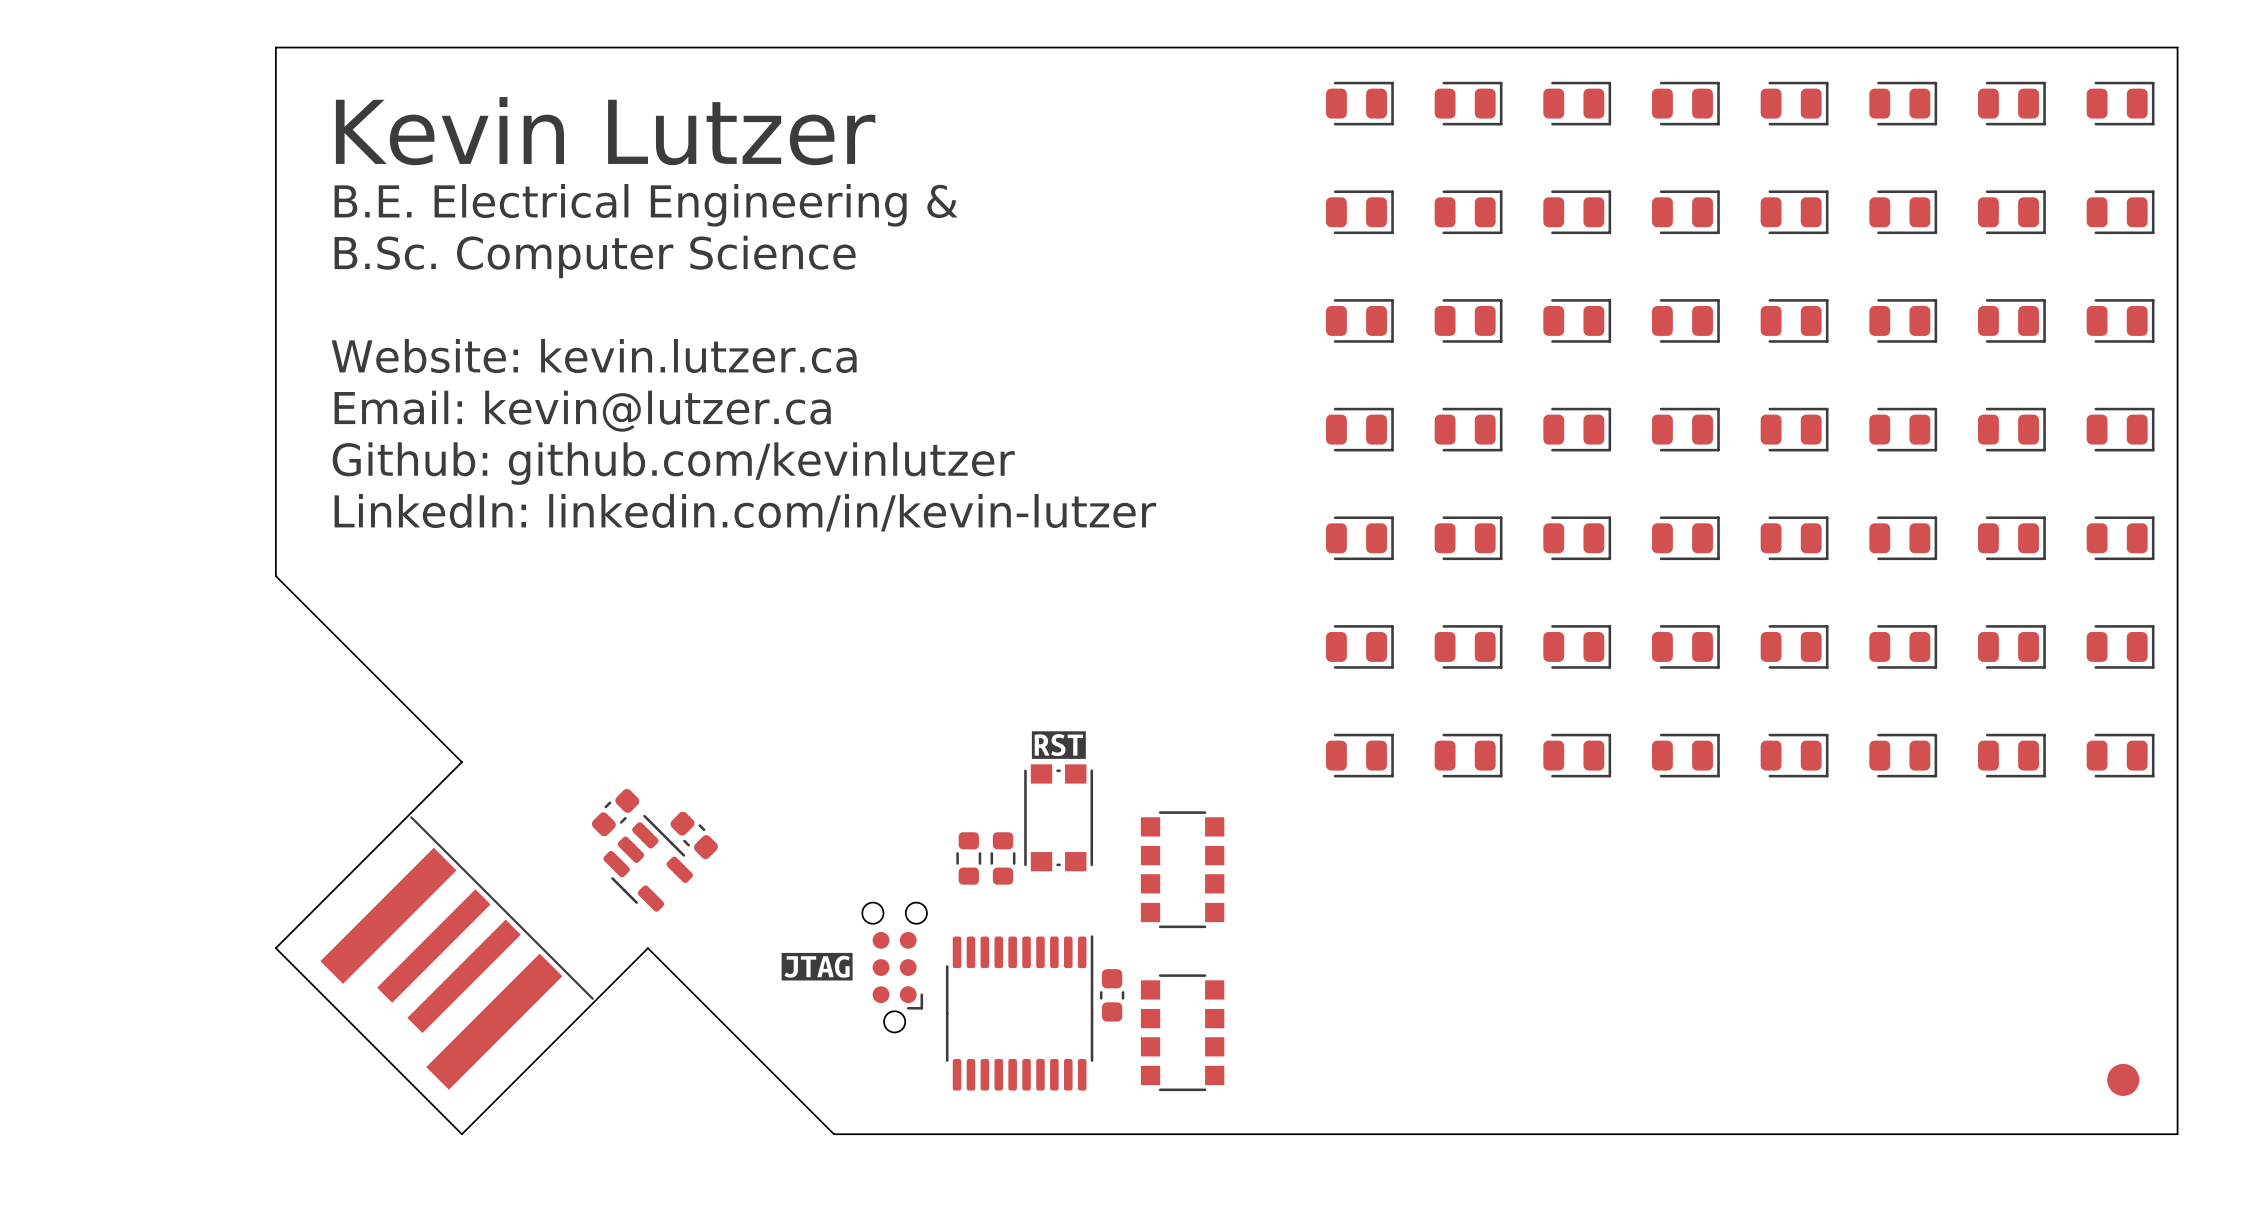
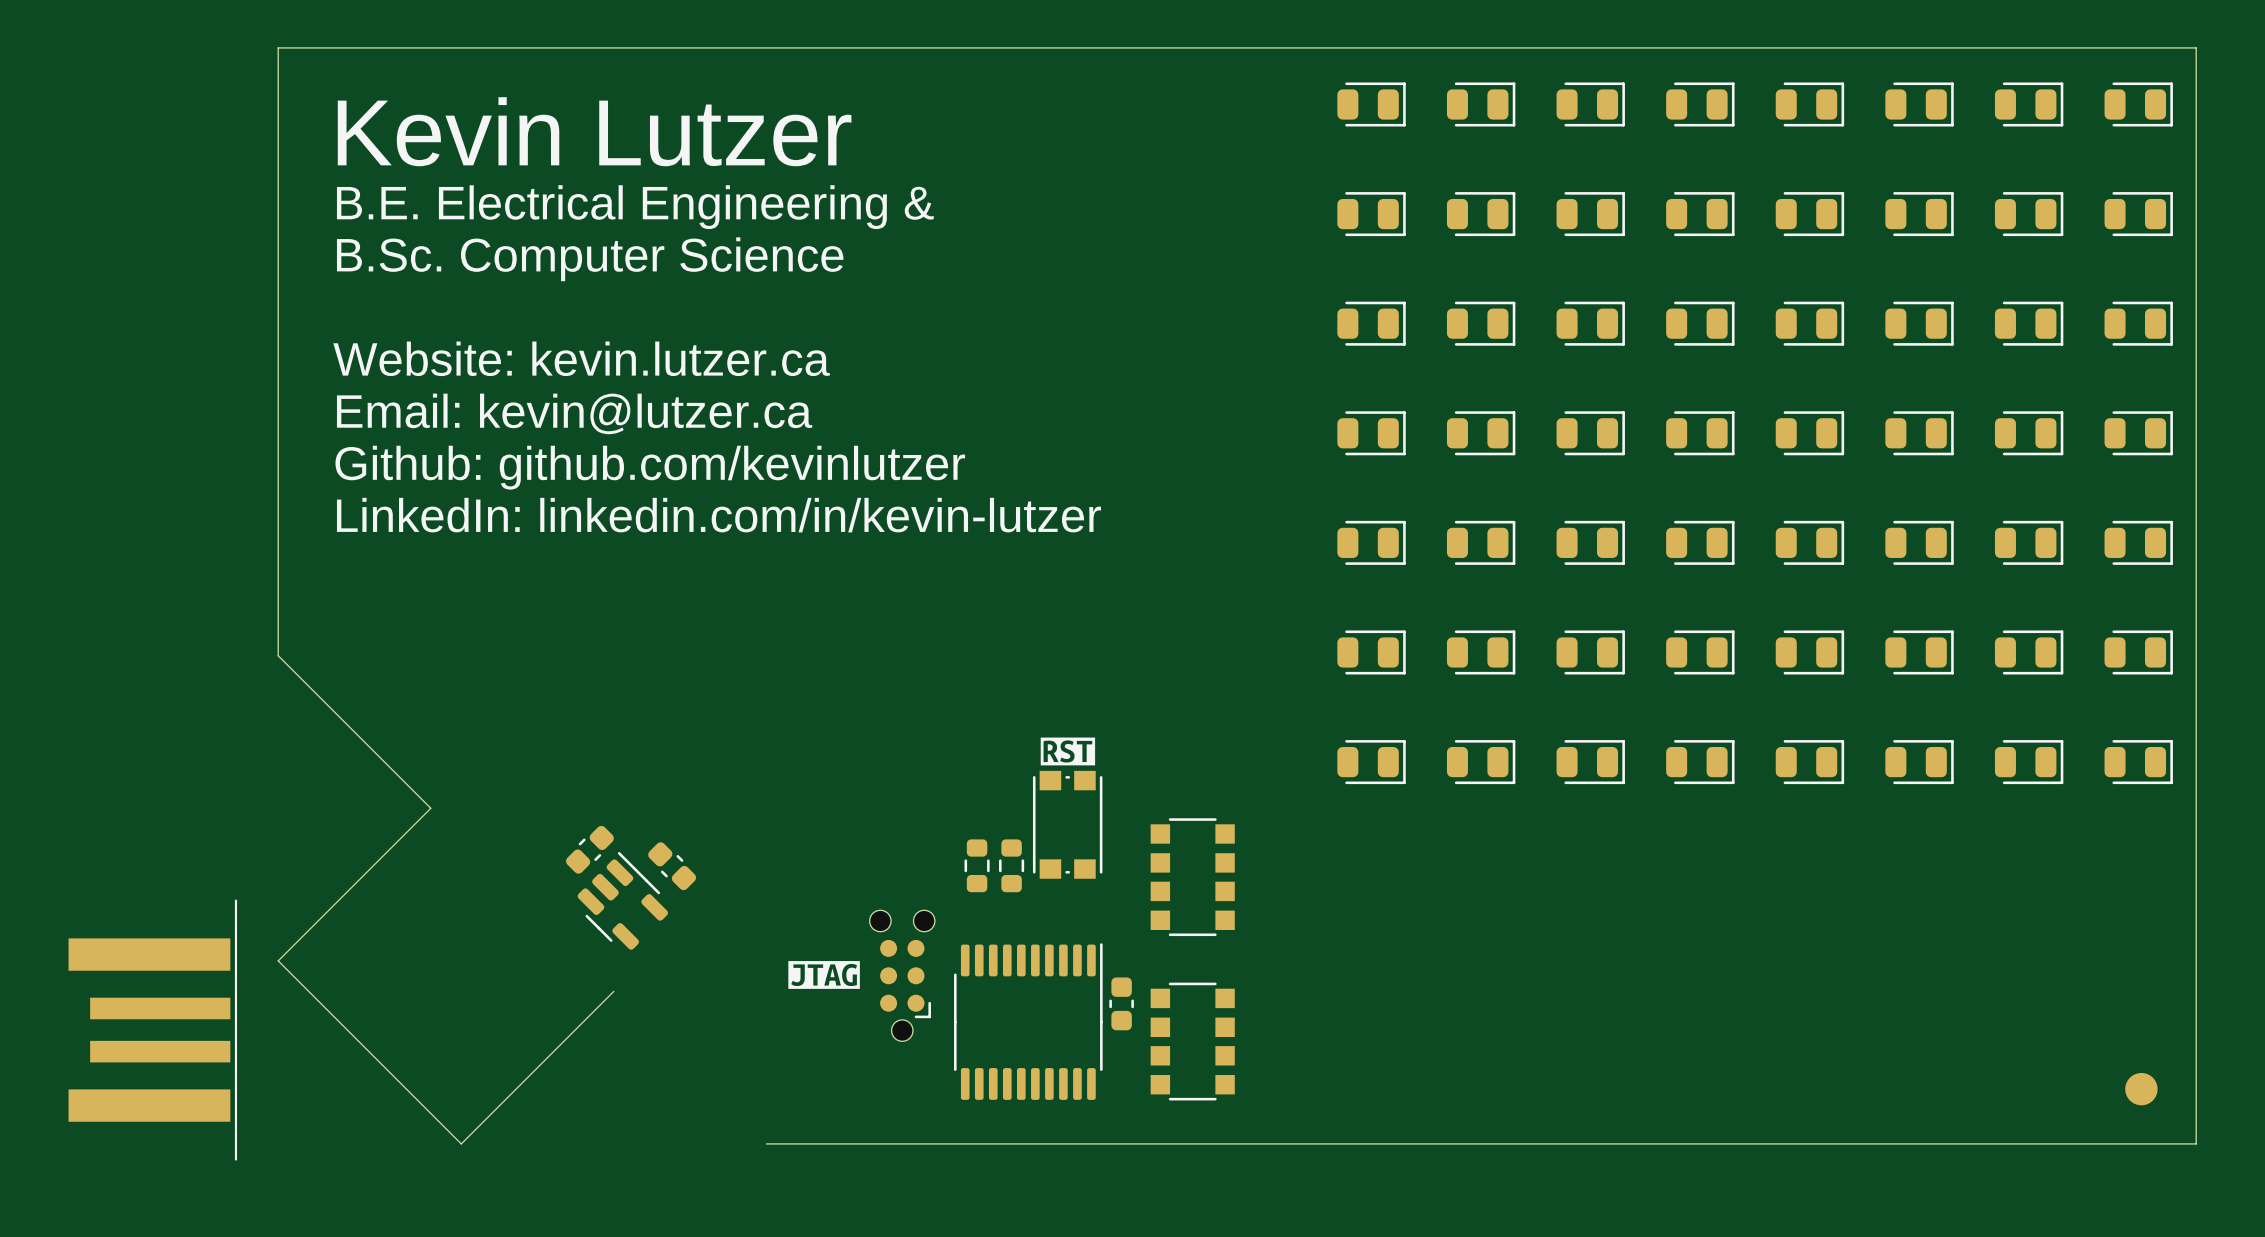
board edge: (275, 576) (461, 762) (275, 948) (461, 1134) (647, 948) (834, 1134) -> (278, 581) (278, 655) (430, 808) (278, 960) (461, 1143) (613, 991)
part: (615, 812) -> none
part: (694, 835) -> none
part: none -> (589, 849)
part: none -> (672, 866)
part position: (648, 863) -> (622, 900)
part: (457, 952) -> none
part: none -> (152, 1030)
board edge: none -> (766, 1143) (841, 1143)

